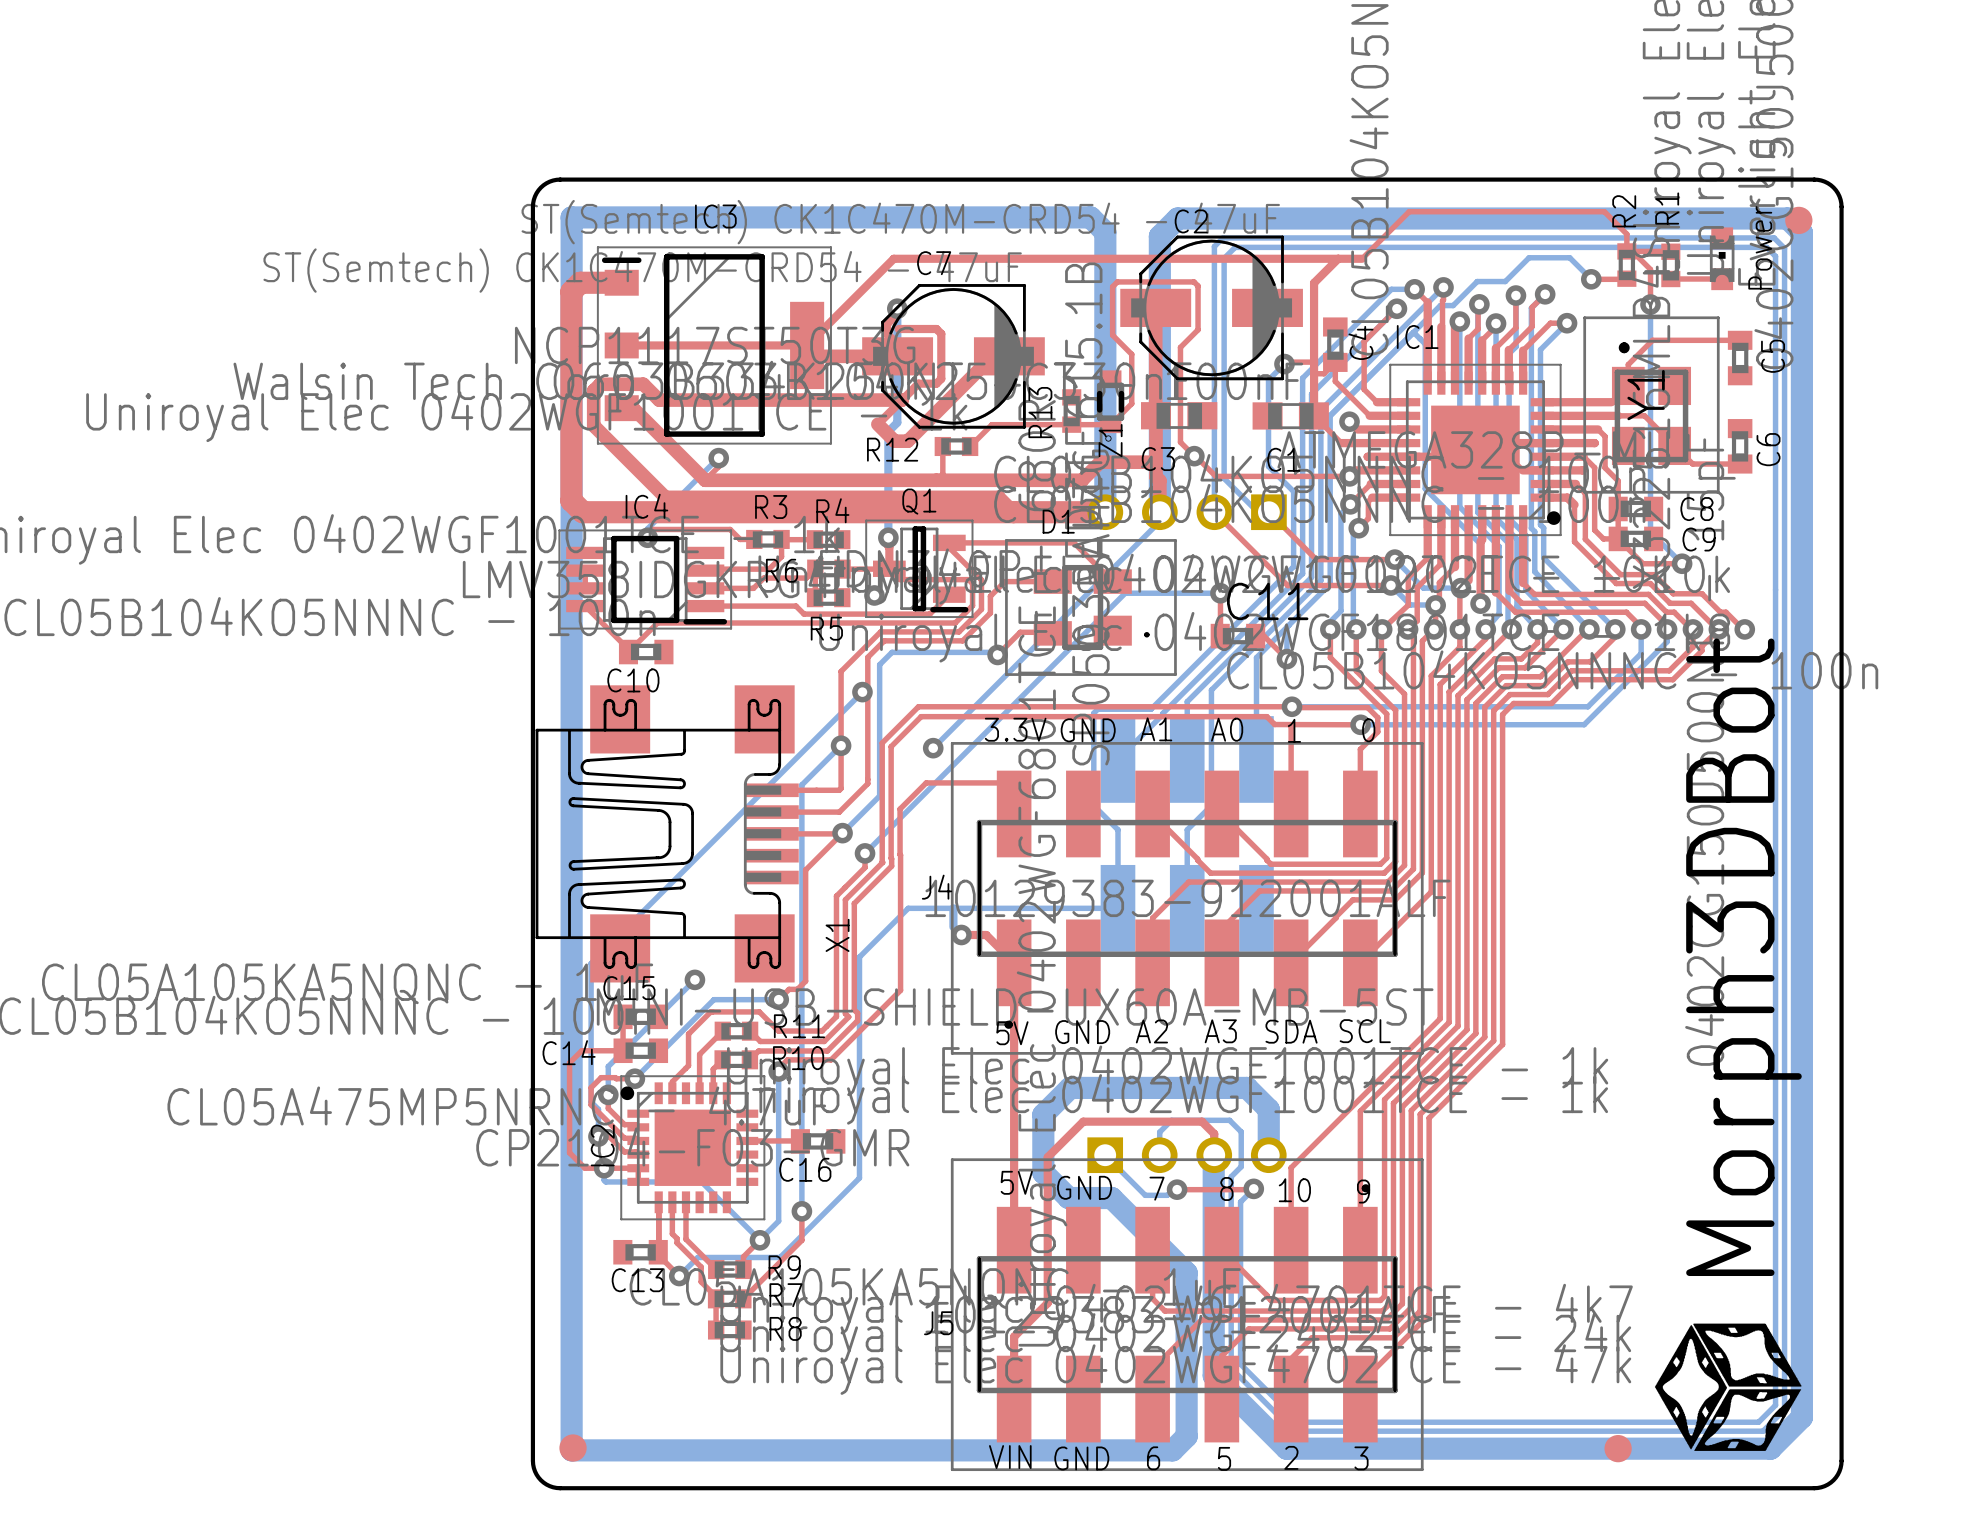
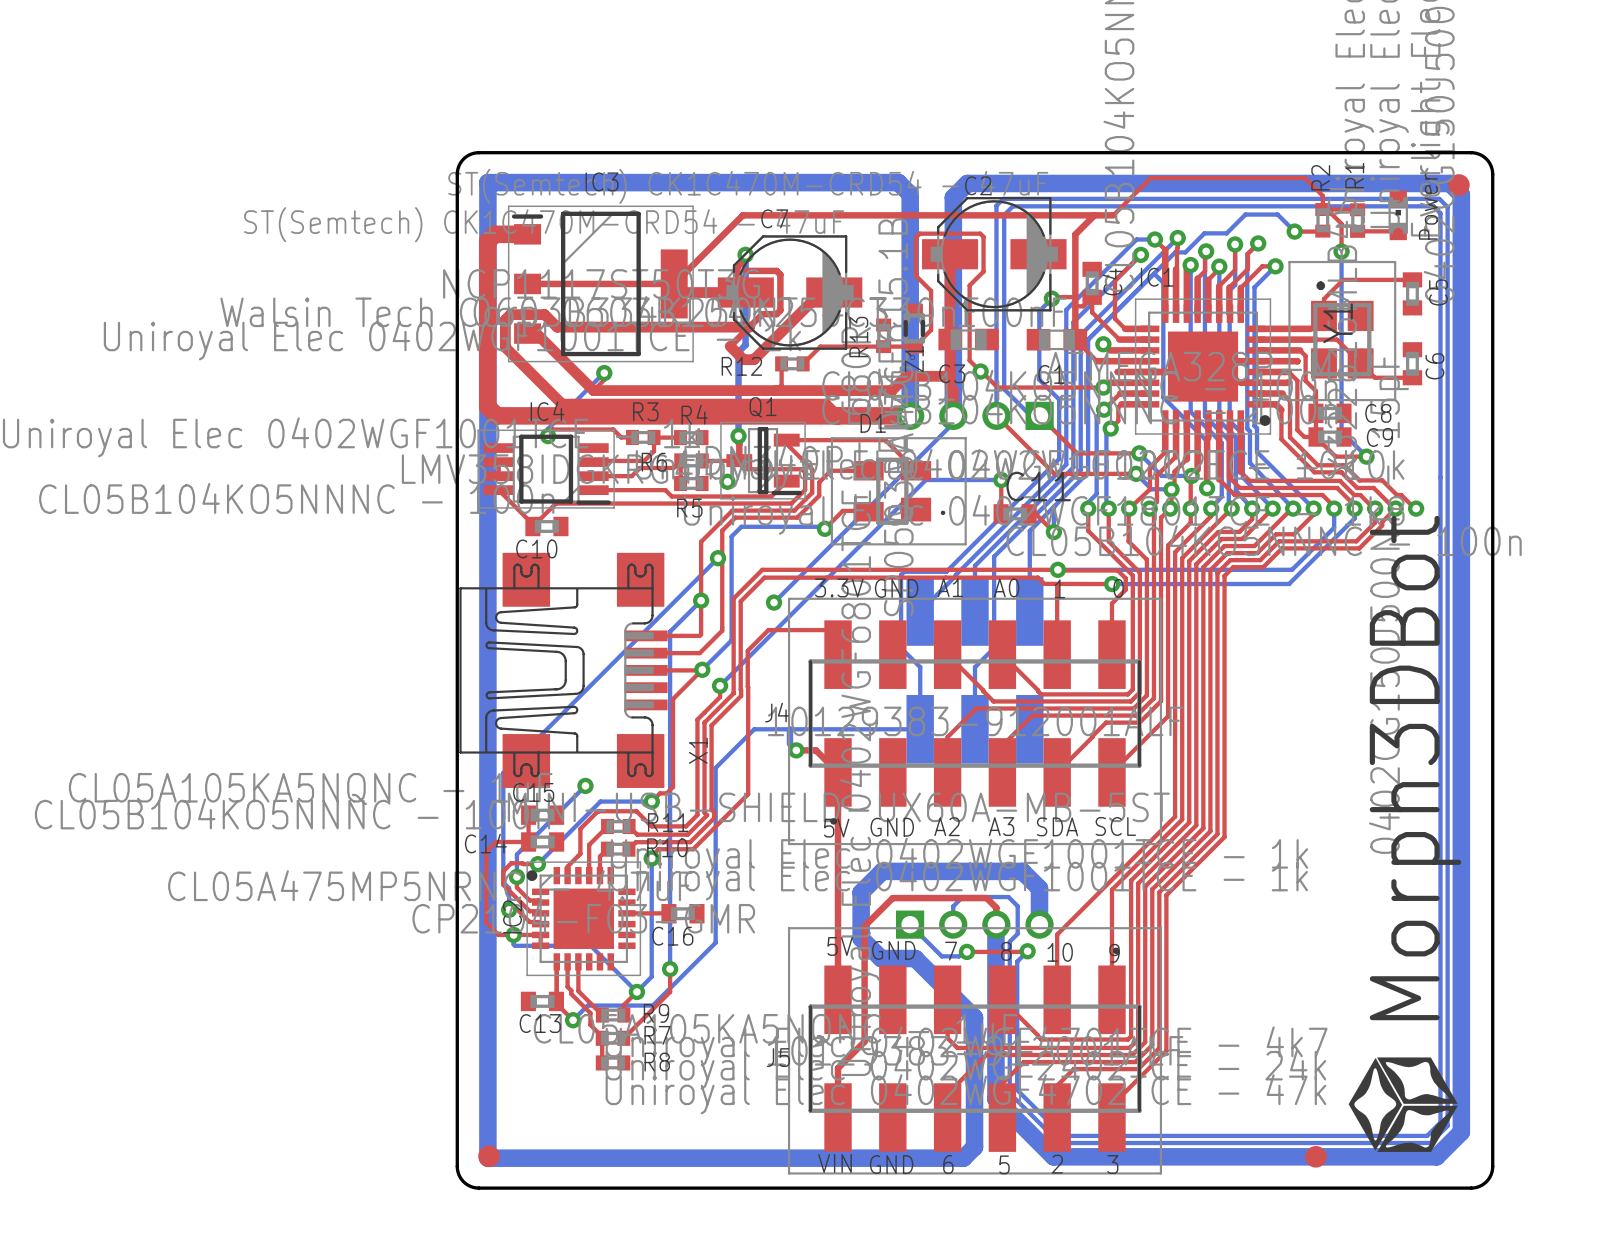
drawing shape: [1654, 638, 1802, 1451] -> [1348, 515, 1462, 1152]

